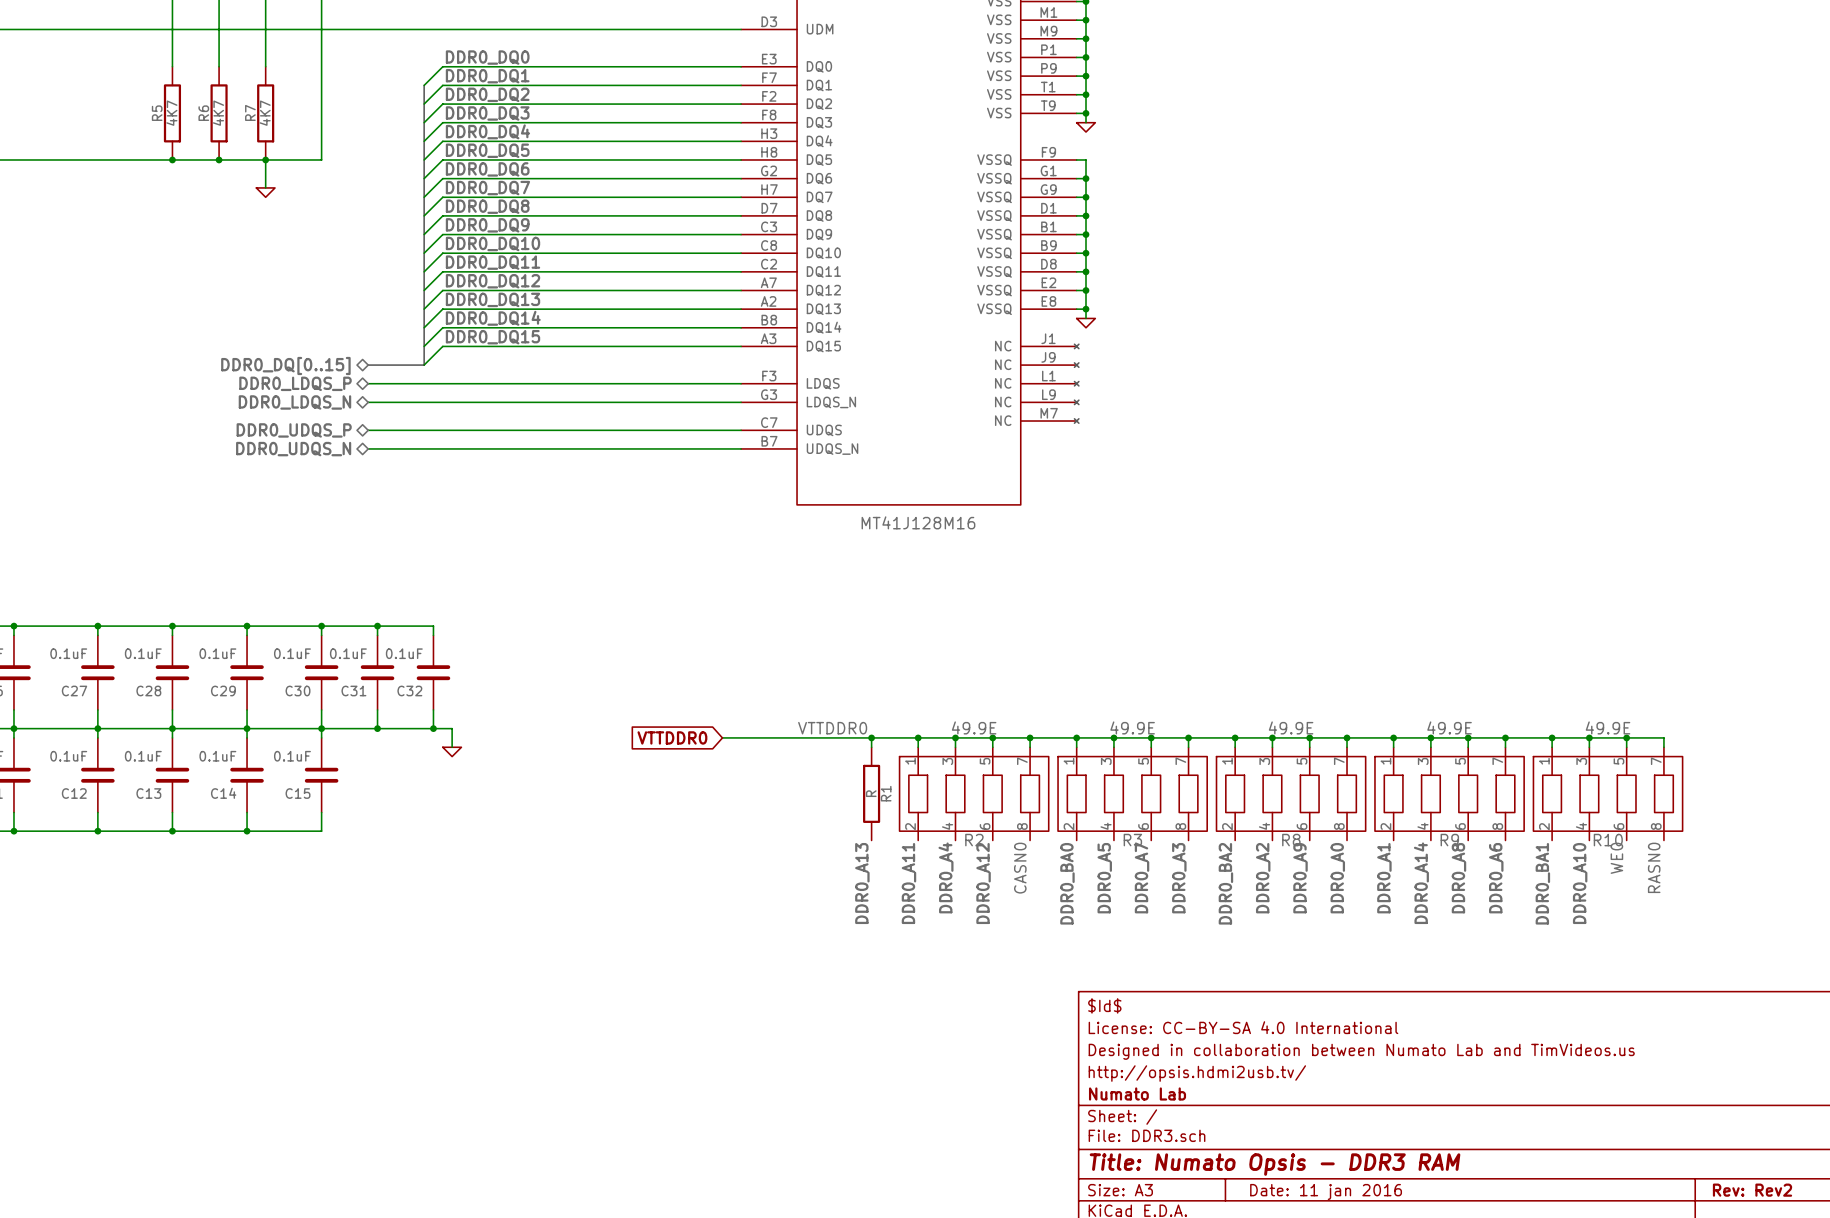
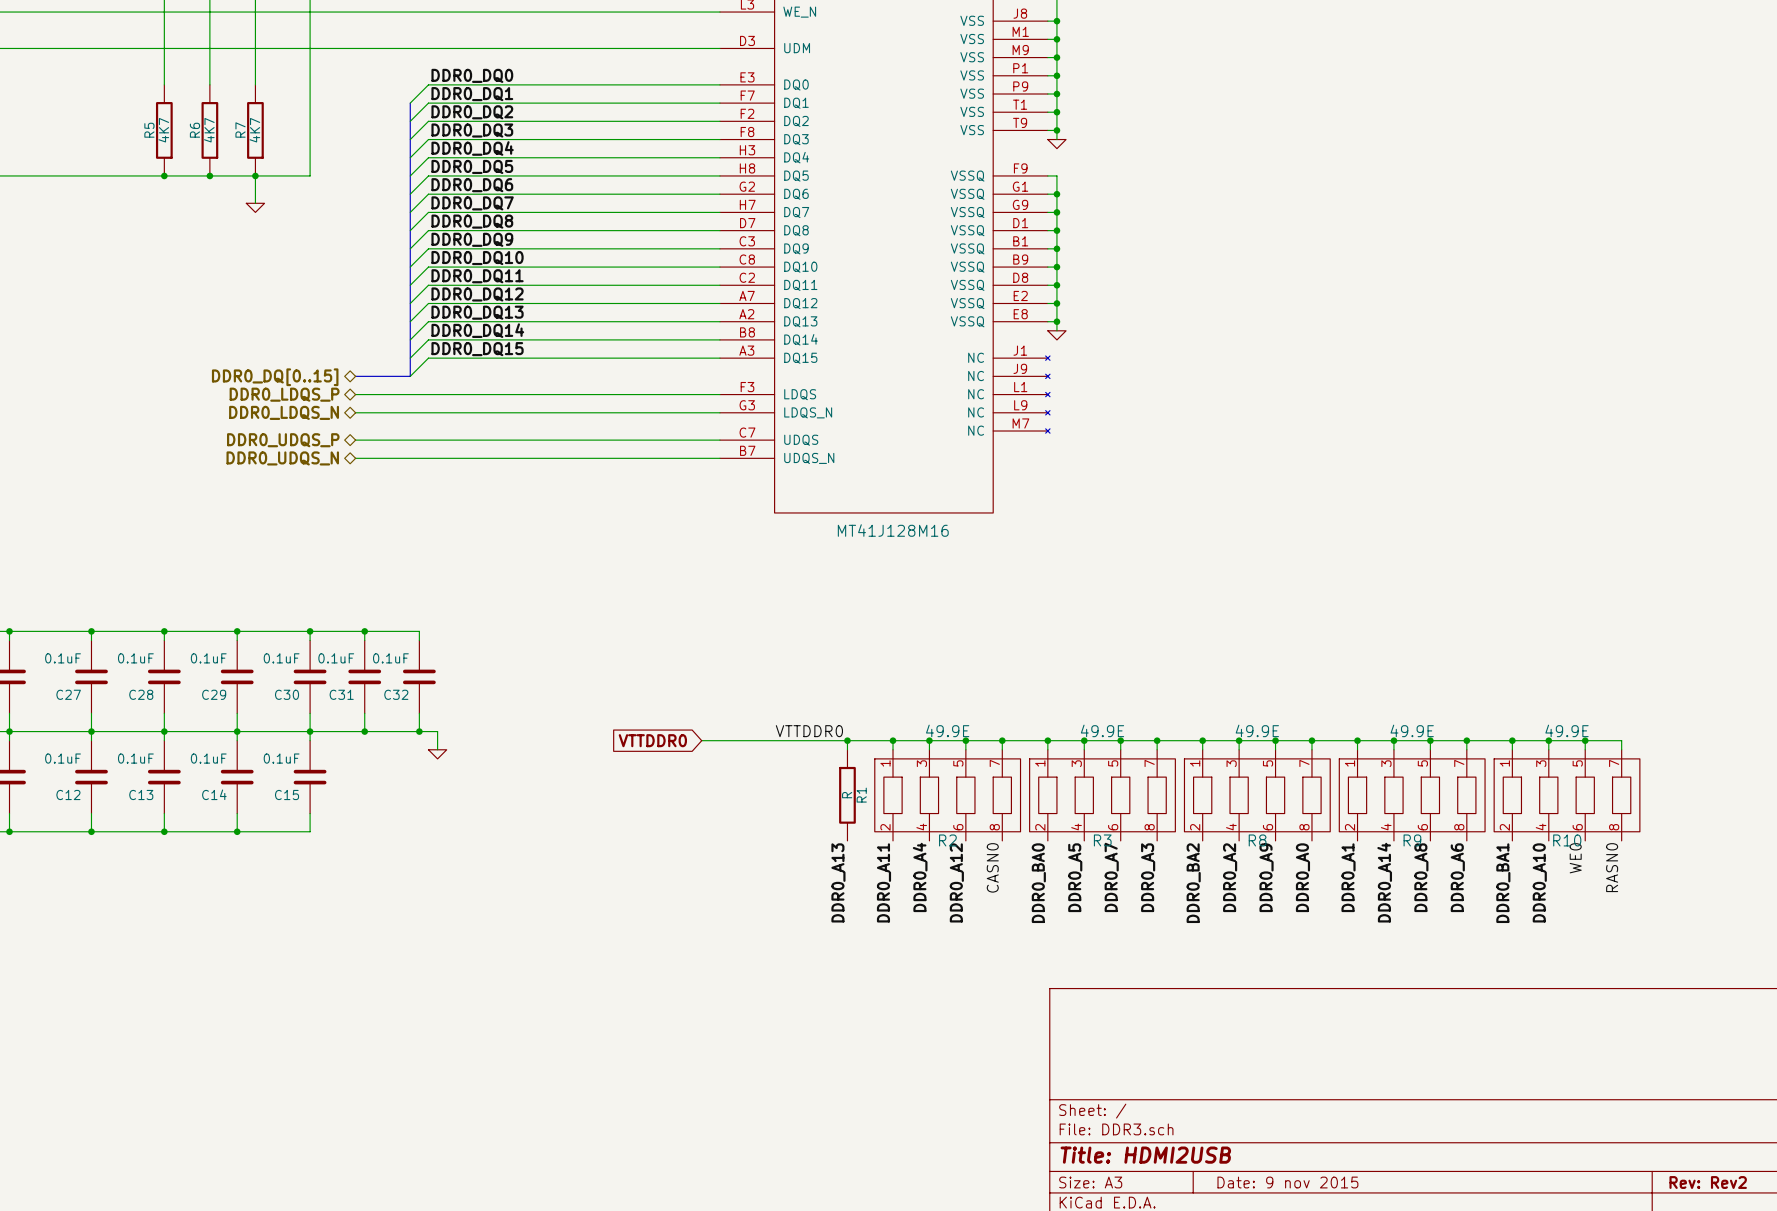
title block: $Id$ (1104, 1005) -> none
title block: License: CC-BY-SA 4.0 International (1243, 1027) -> none
title block: Designed in collaboration between Numato Lab and TimVideos.us (1361, 1051) -> none
title block: http://opsis.hdmi2usb.tv/ (1197, 1073) -> none
title block: Numato Lab (1137, 1093) -> none
title block: Title: Numato Opsis - DDR3 RAM (1275, 1164) -> Title: HDMI2USB (1145, 1155)
title block: Date: 11 jan 2016 (1326, 1191) -> Date: 9 nov 2015 (1287, 1182)

